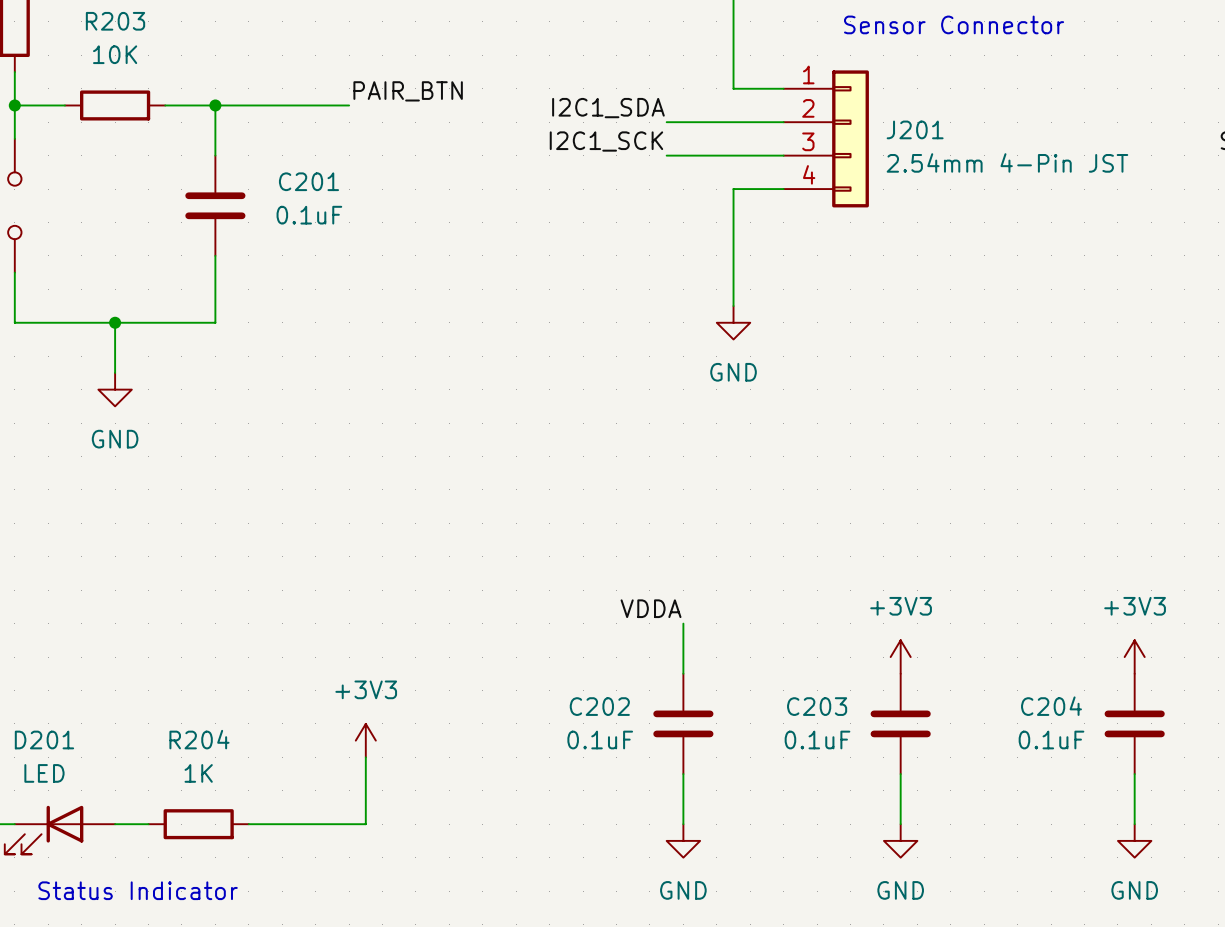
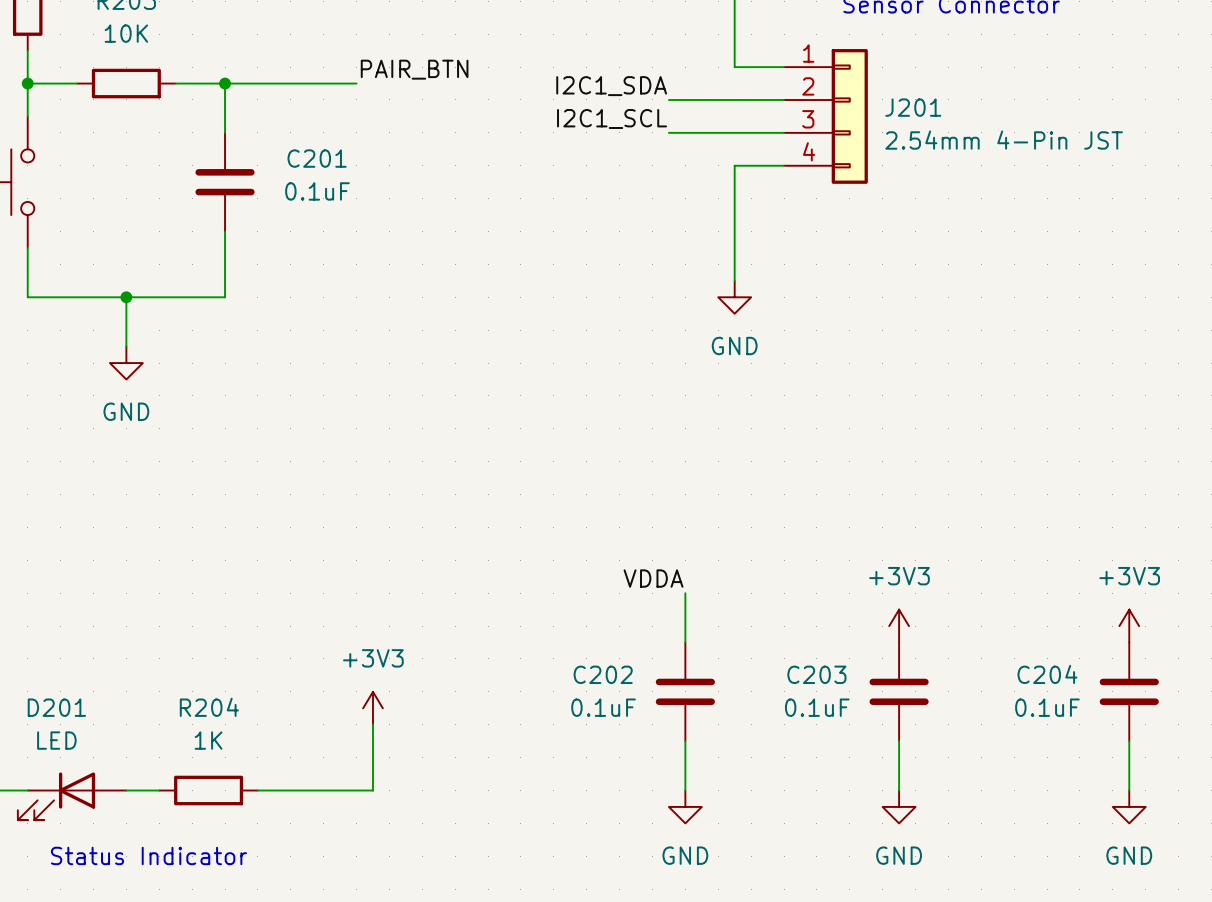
label: I2C1_SCK (606, 141) -> I2C1_SCL (612, 118)

